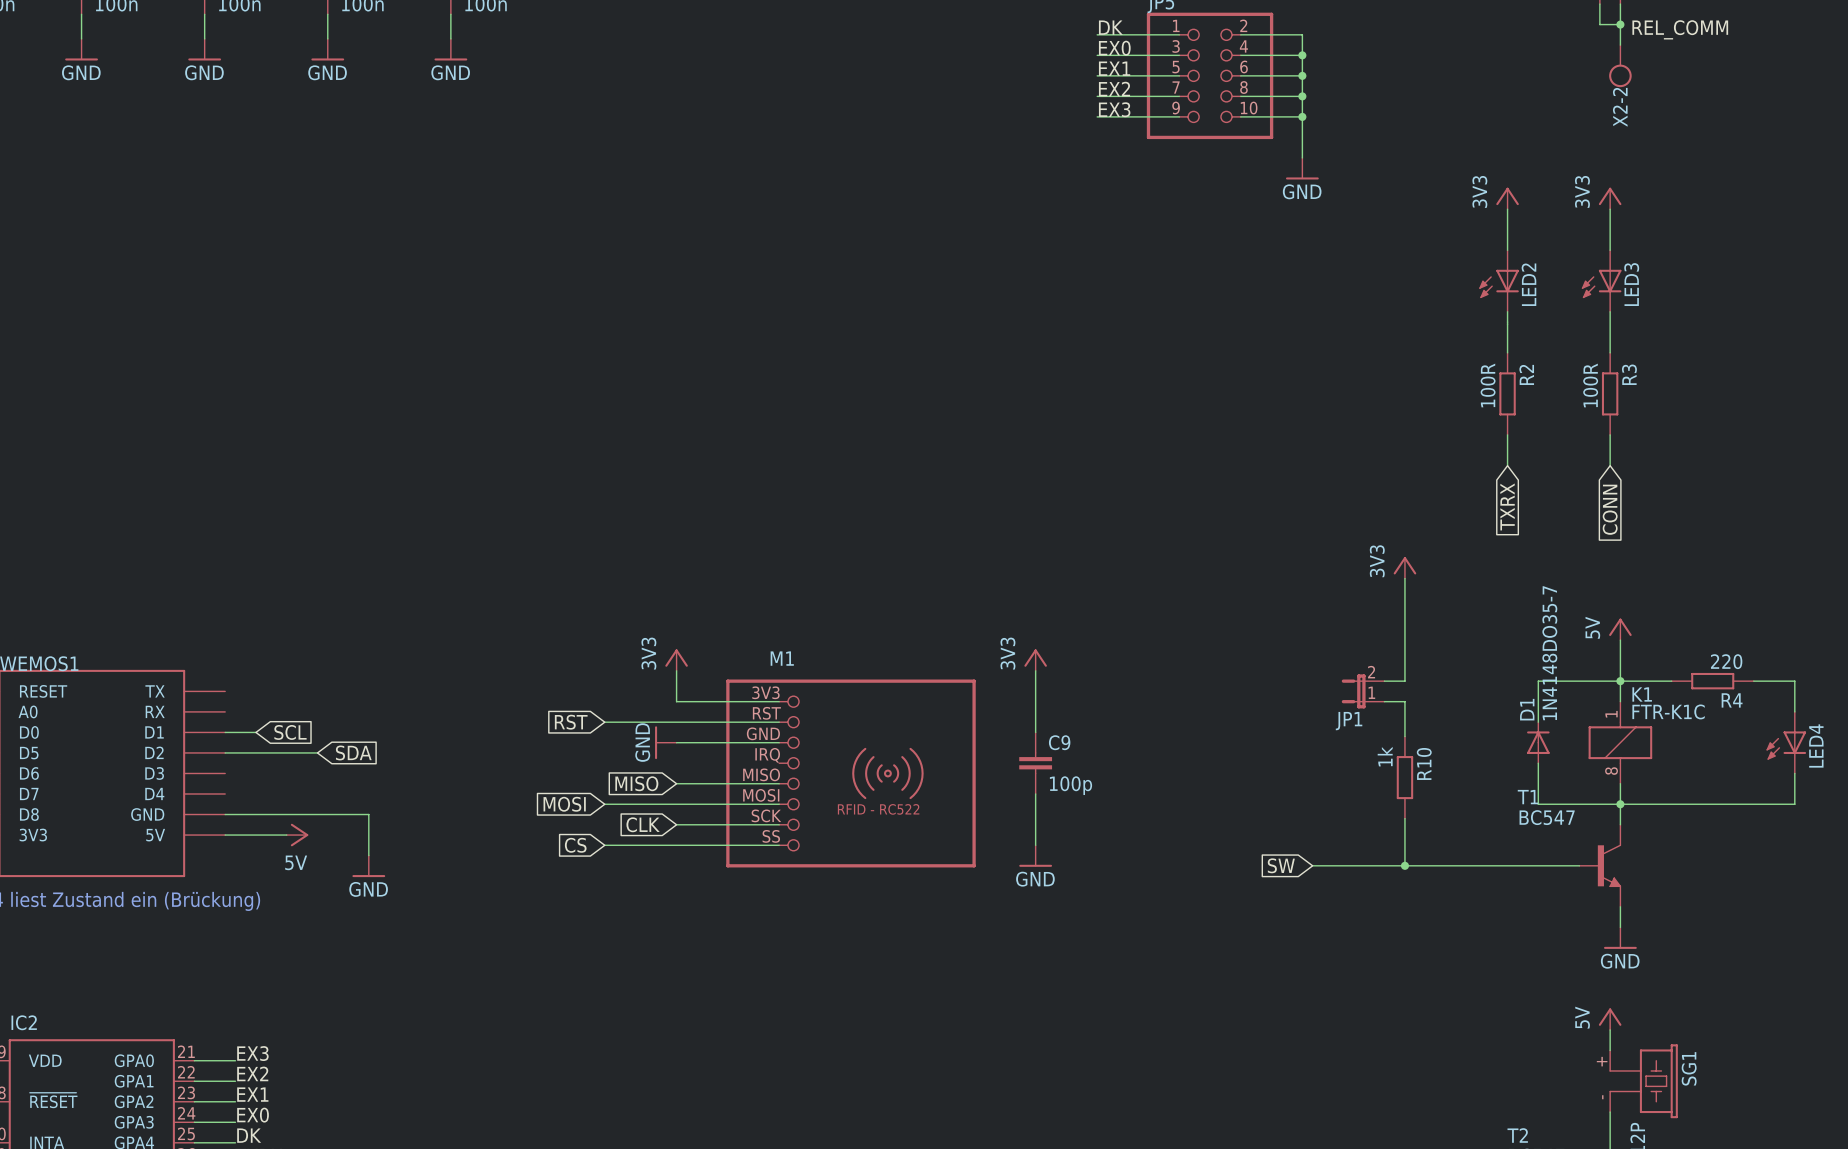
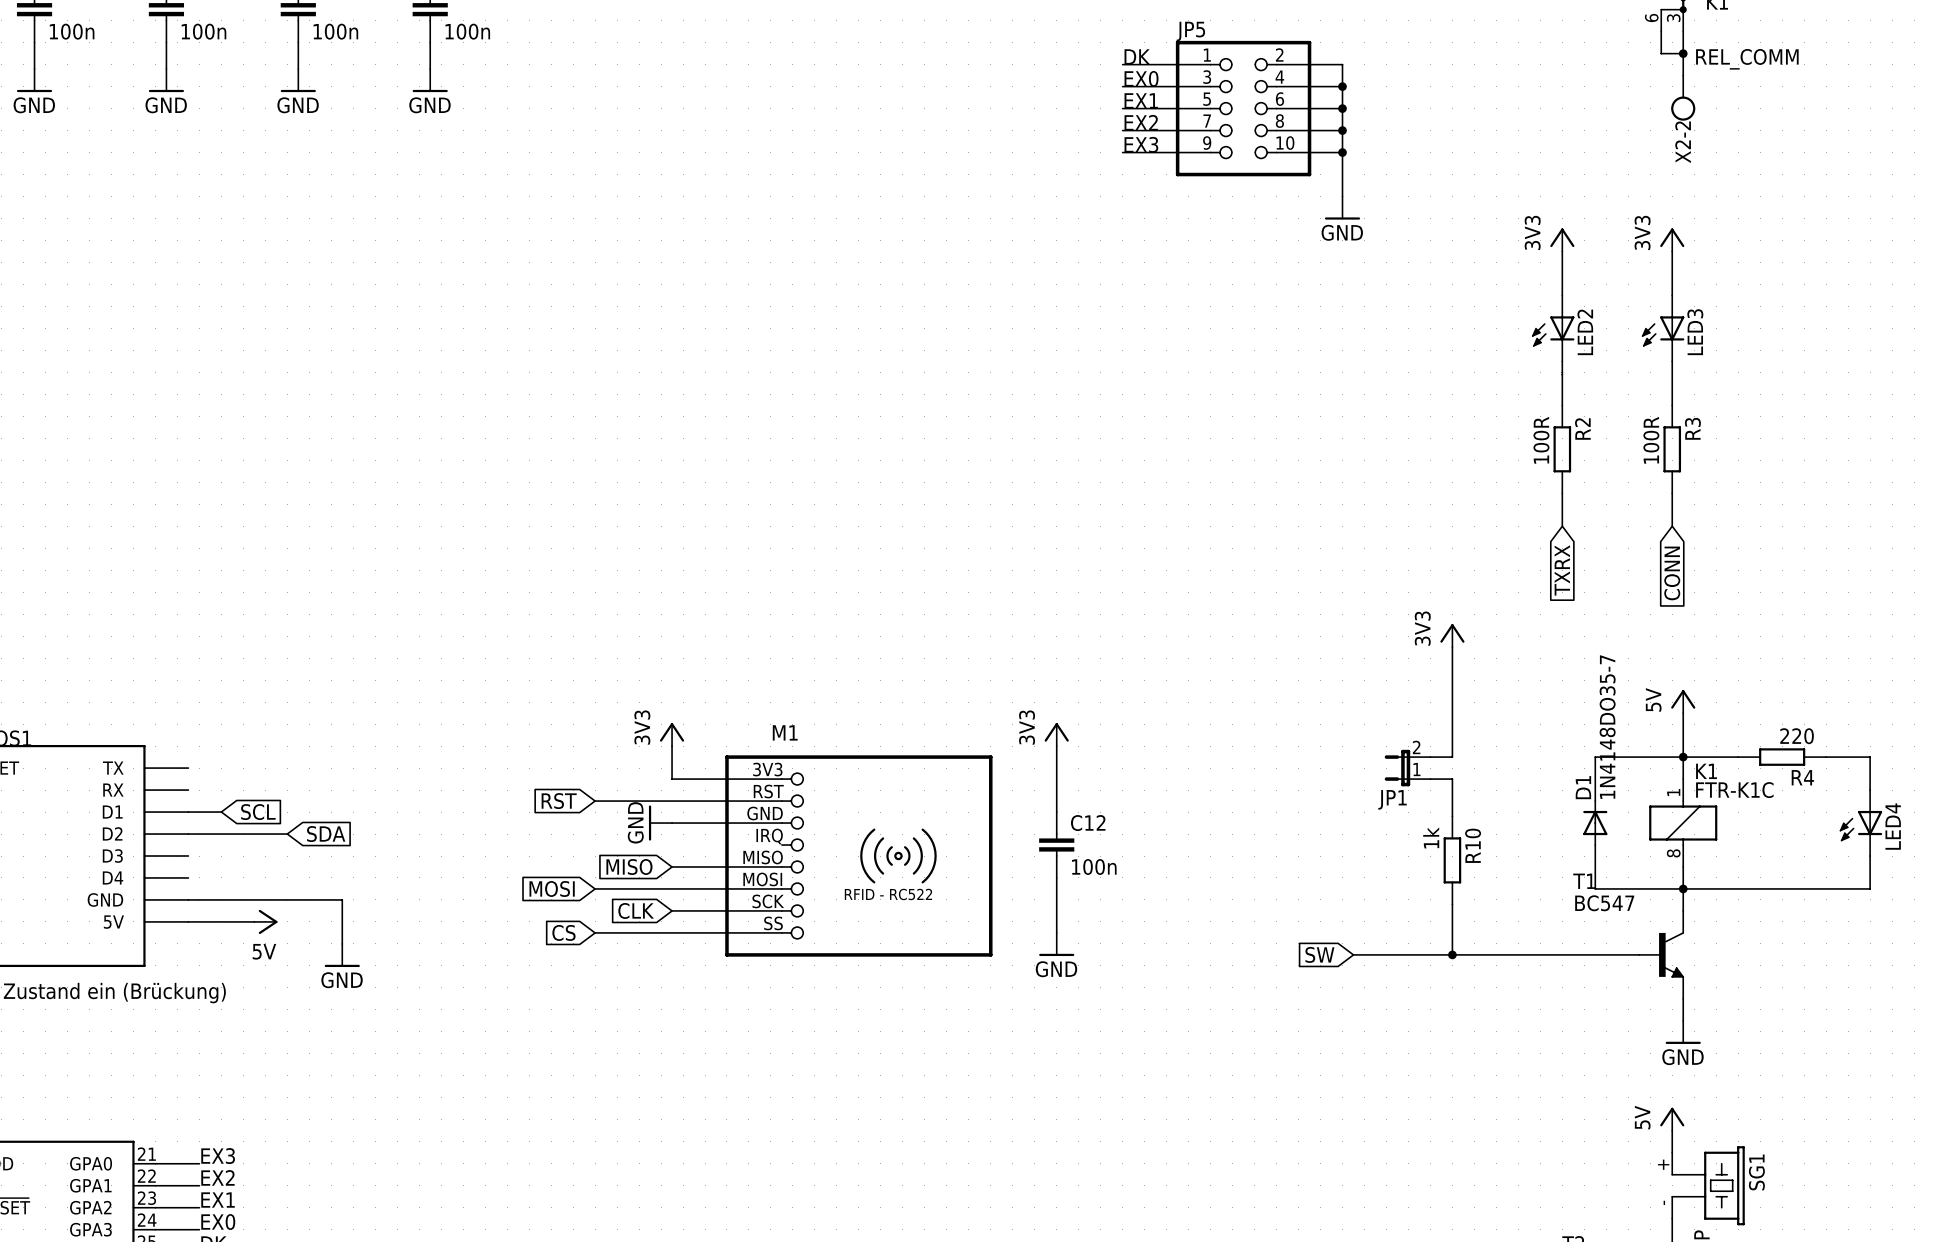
C9 name: C9 (1059, 742) -> C12 (1088, 823)
C9 value: 100p (1070, 785) -> 100n (1094, 867)

